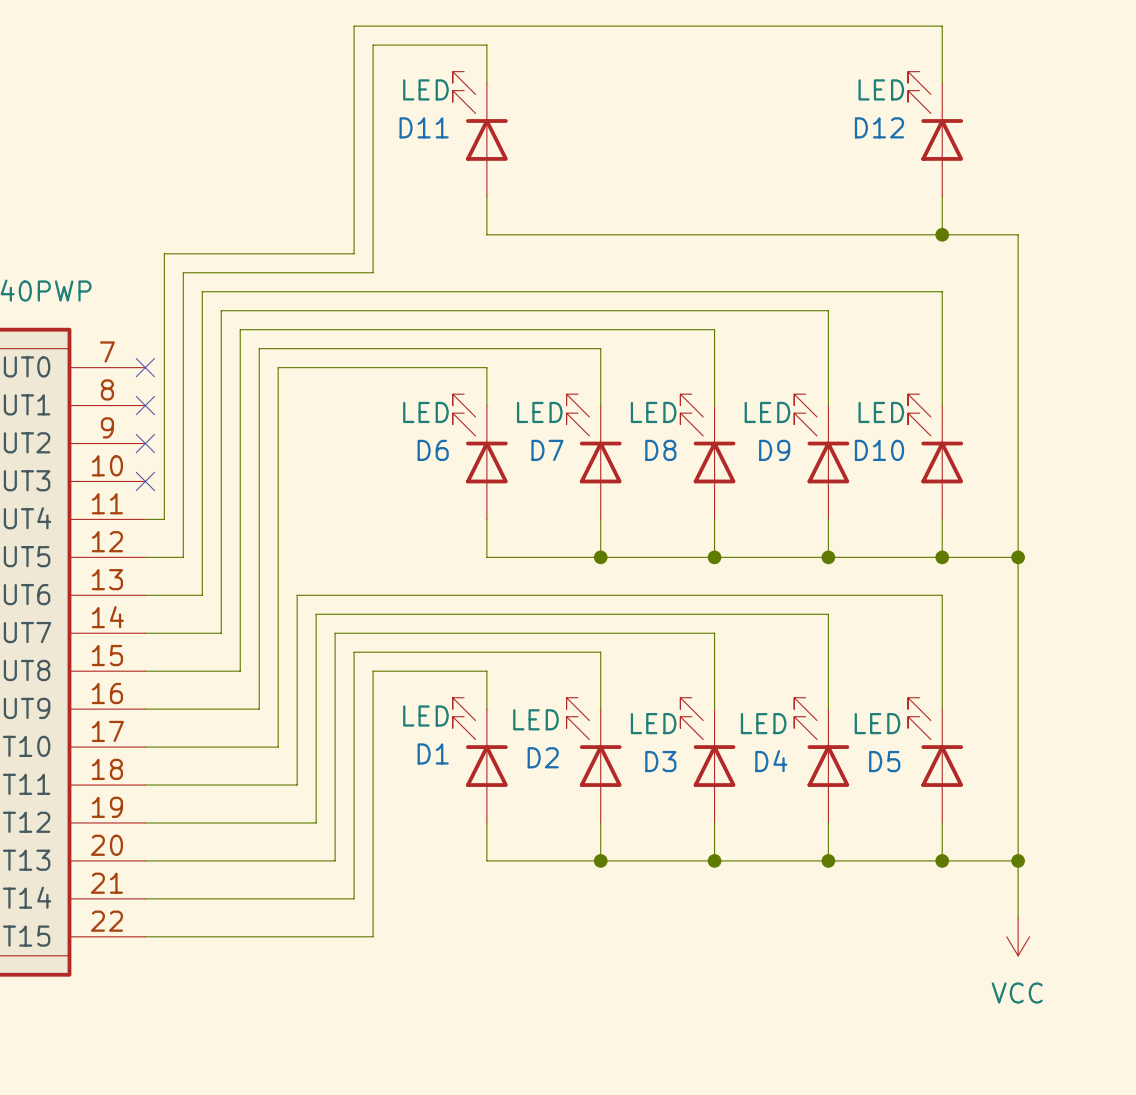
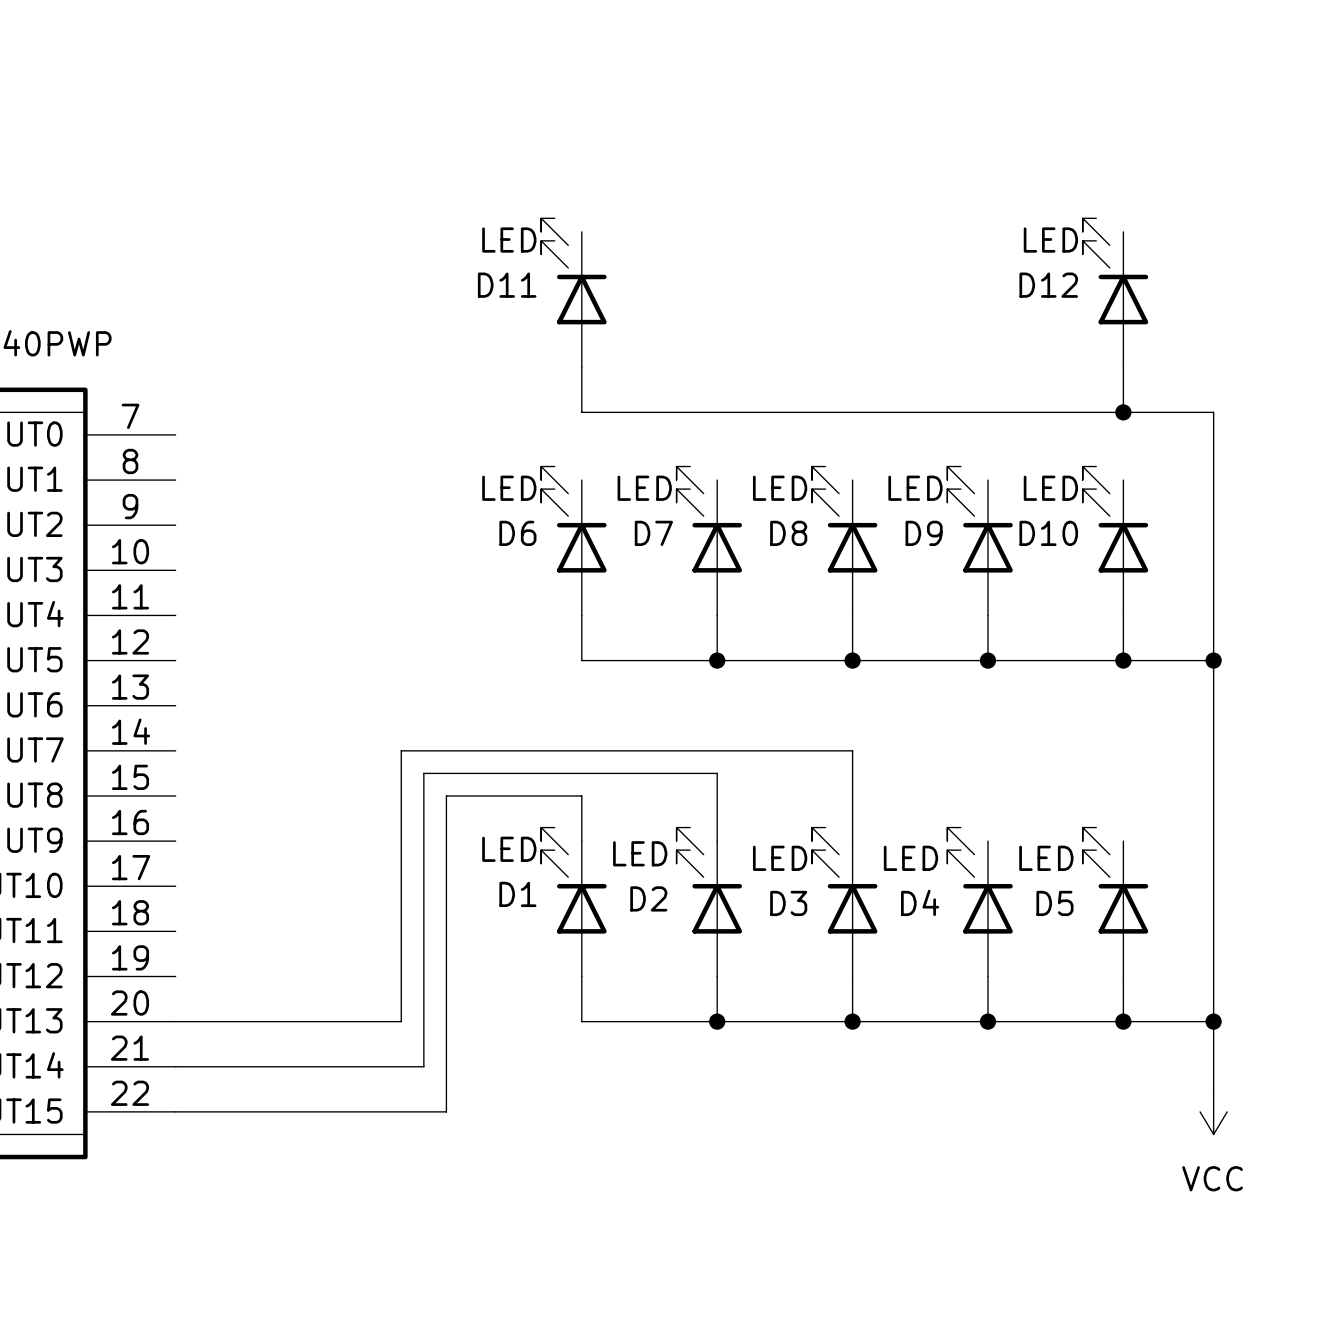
wire: (486, 83) (486, 45) (373, 45) (373, 272) (183, 272) (183, 557) (145, 557) -> none
wire: (942, 83) (942, 26) (354, 26) (354, 253) (164, 253) (164, 519) (145, 519) -> none
D11 position: (480, 134) -> (573, 292)
D12 position: (935, 134) -> (1115, 292)
wire: (486, 196) (486, 234) (1018, 234) (1018, 348) -> (717, 412) (1213, 412)
junction: (942, 234) -> none
wire: (942, 310) (942, 291) (202, 291) (202, 595) (145, 595) -> none
wire: (486, 348) (259, 348) (259, 709) (145, 709) -> (581, 412) (581, 367)
wire: (600, 348) (600, 405) -> none
wire: (942, 348) (942, 405) -> none
junction: none -> (1123, 412)
no-connect mark: (145, 367) -> none
no-connect mark: (145, 405) -> none
wire: (486, 405) (486, 367) (278, 367) (278, 747) (145, 747) -> none
wire: (714, 405) (714, 329) (240, 329) (240, 671) (145, 671) -> none
wire: (828, 405) (828, 310) (221, 310) (221, 633) (145, 633) -> none
no-connect mark: (145, 443) -> none
no-connect mark: (145, 481) -> none
wire: (828, 709) (828, 614) (316, 614) (316, 822) (145, 822) -> none
wire: (942, 709) (942, 595) (297, 595) (297, 785) (145, 785) -> none

